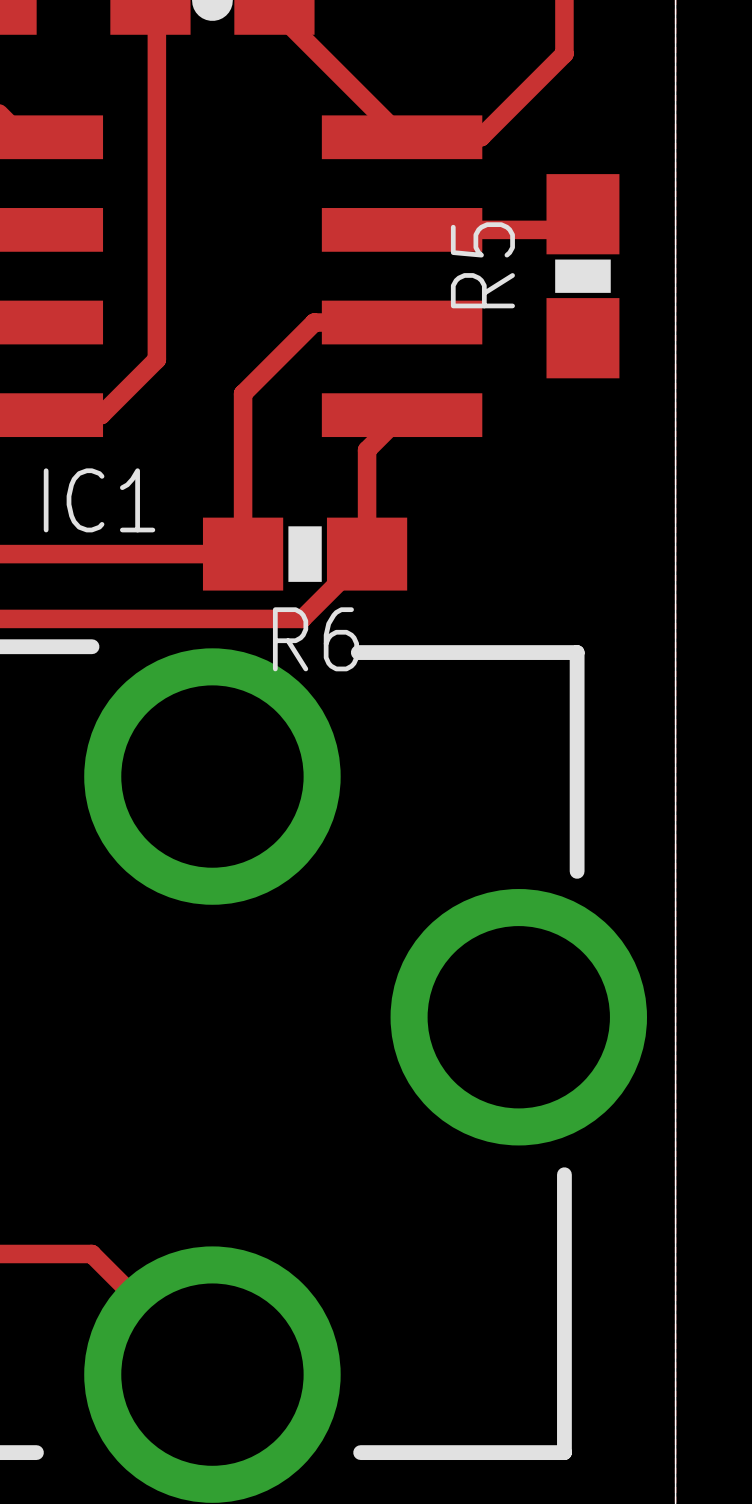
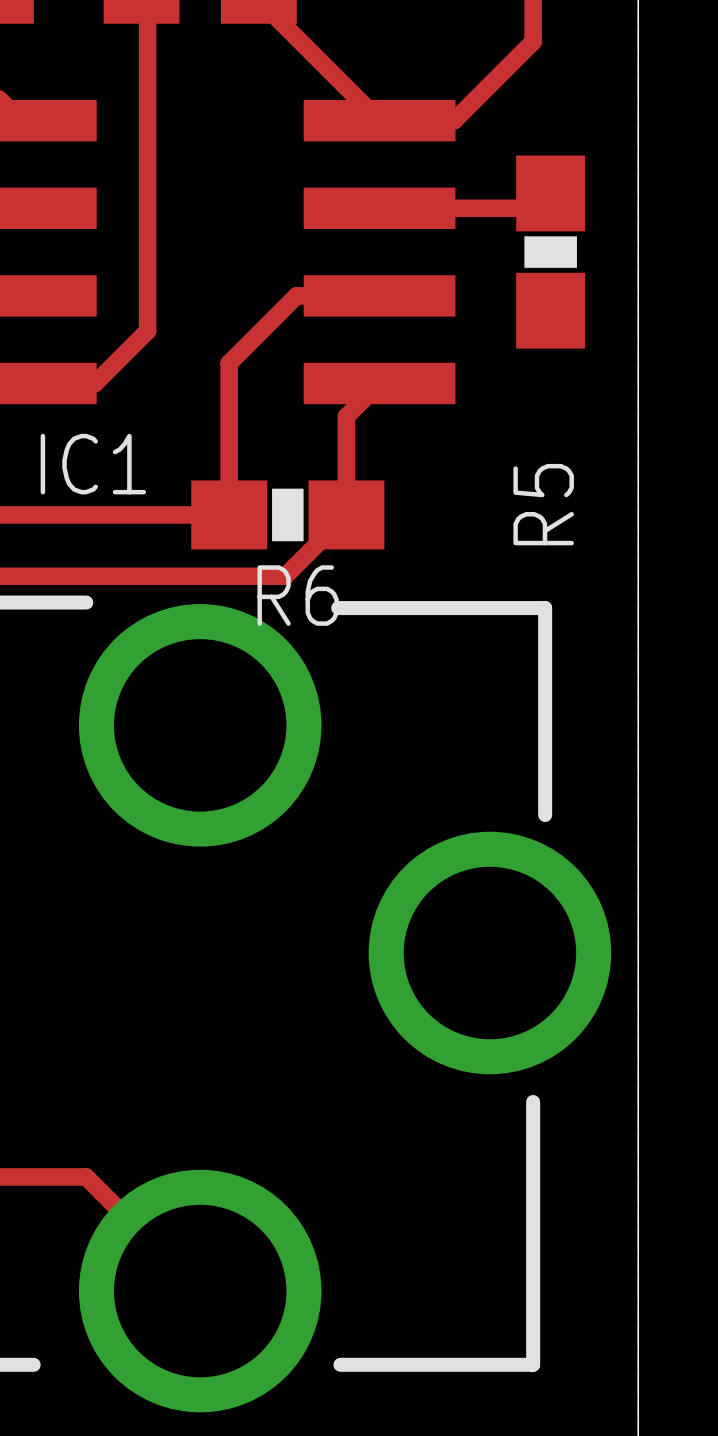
R5 name position: R5 (482, 265) -> R5 (543, 504)

